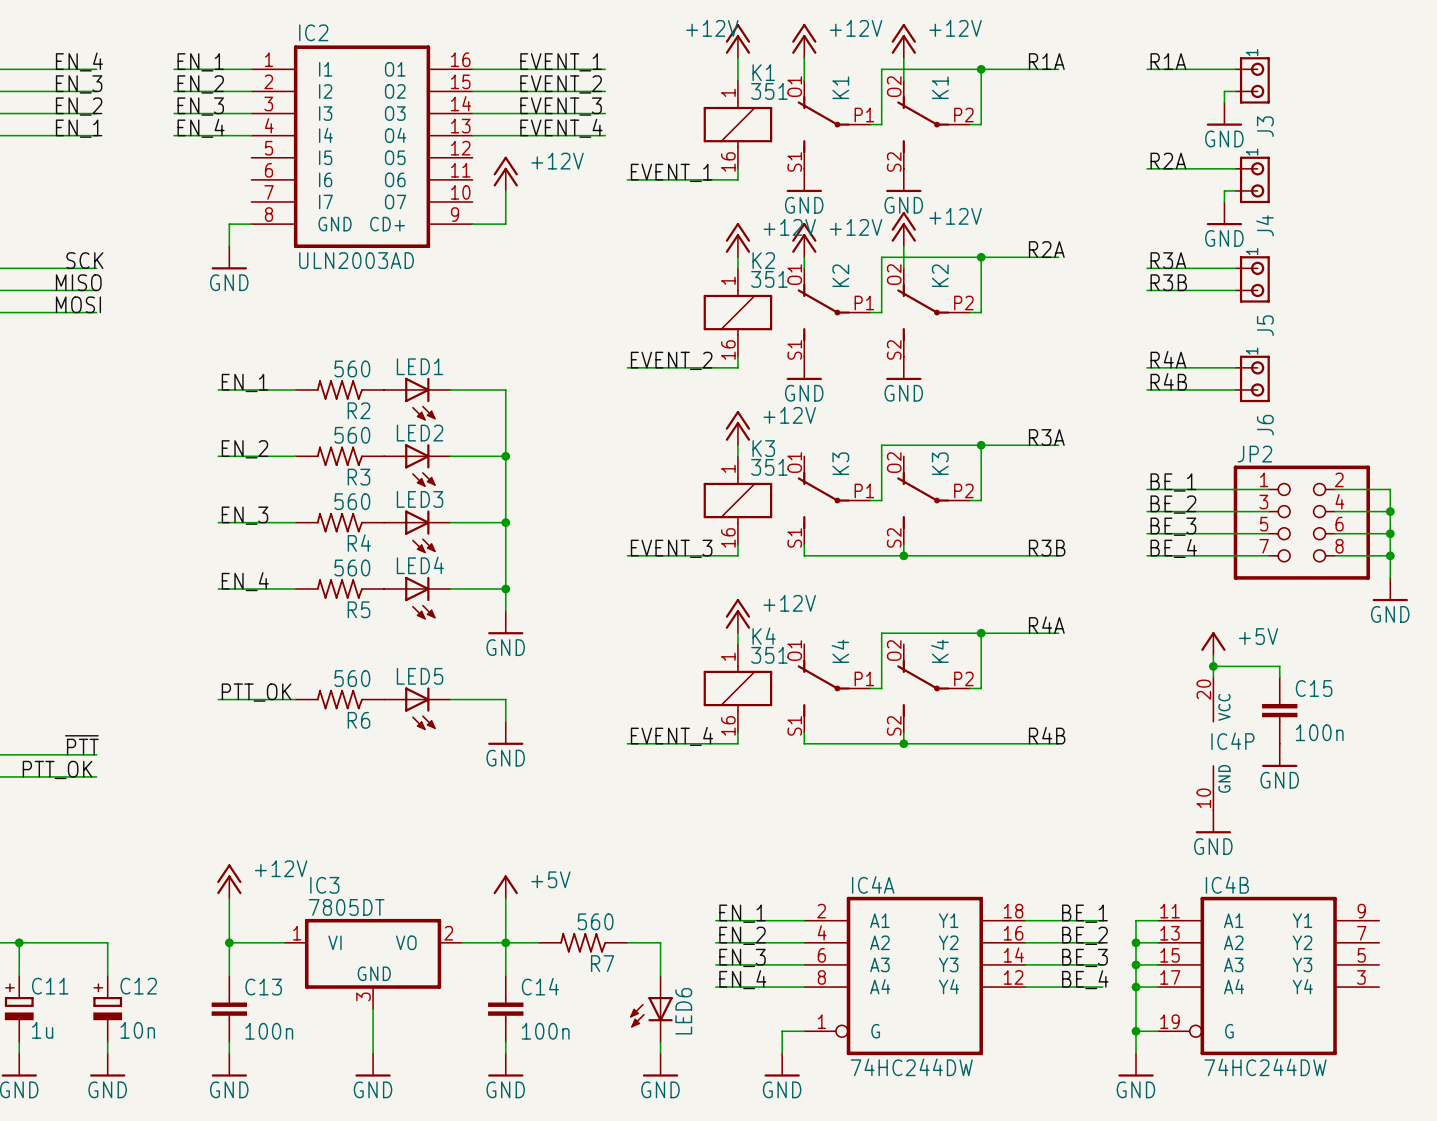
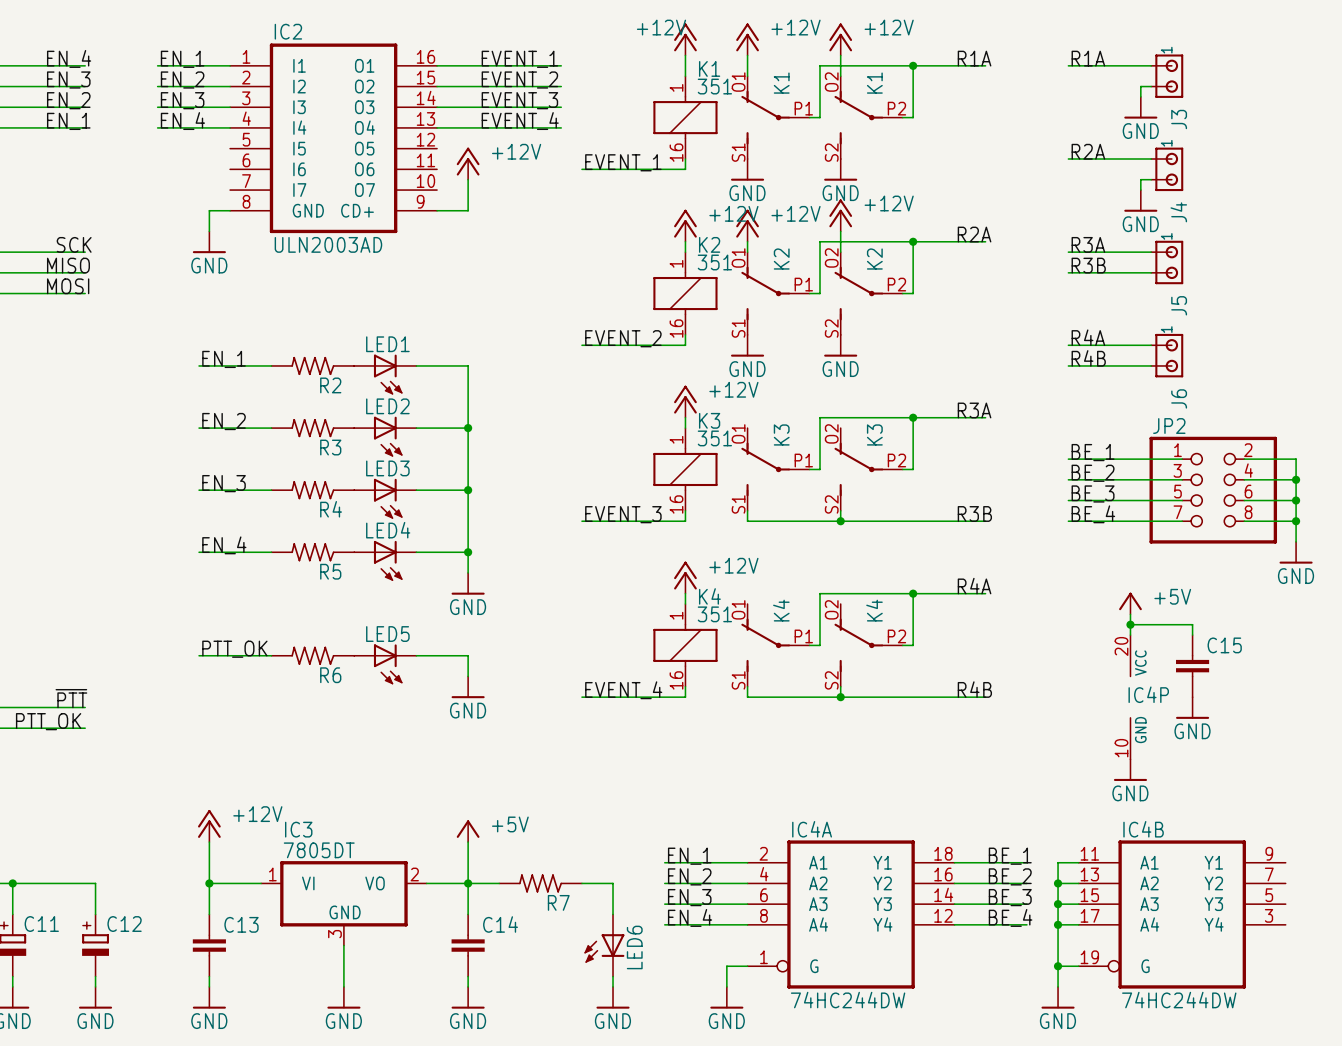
R2 value: 560 (352, 368) -> none
R3 value: 560 (352, 435) -> none
R4 value: 560 (352, 501) -> none
R5 value: 560 (352, 567) -> none
R6 value: 560 (352, 678) -> none
C15 value: 100n (1319, 732) -> none
R7 value: 560 (595, 921) -> none
C11 value: 1u (42, 1030) -> none
C12 value: 10n (137, 1030) -> none
C13 value: 100n (269, 1031) -> none
C14 value: 100n (545, 1031) -> none

